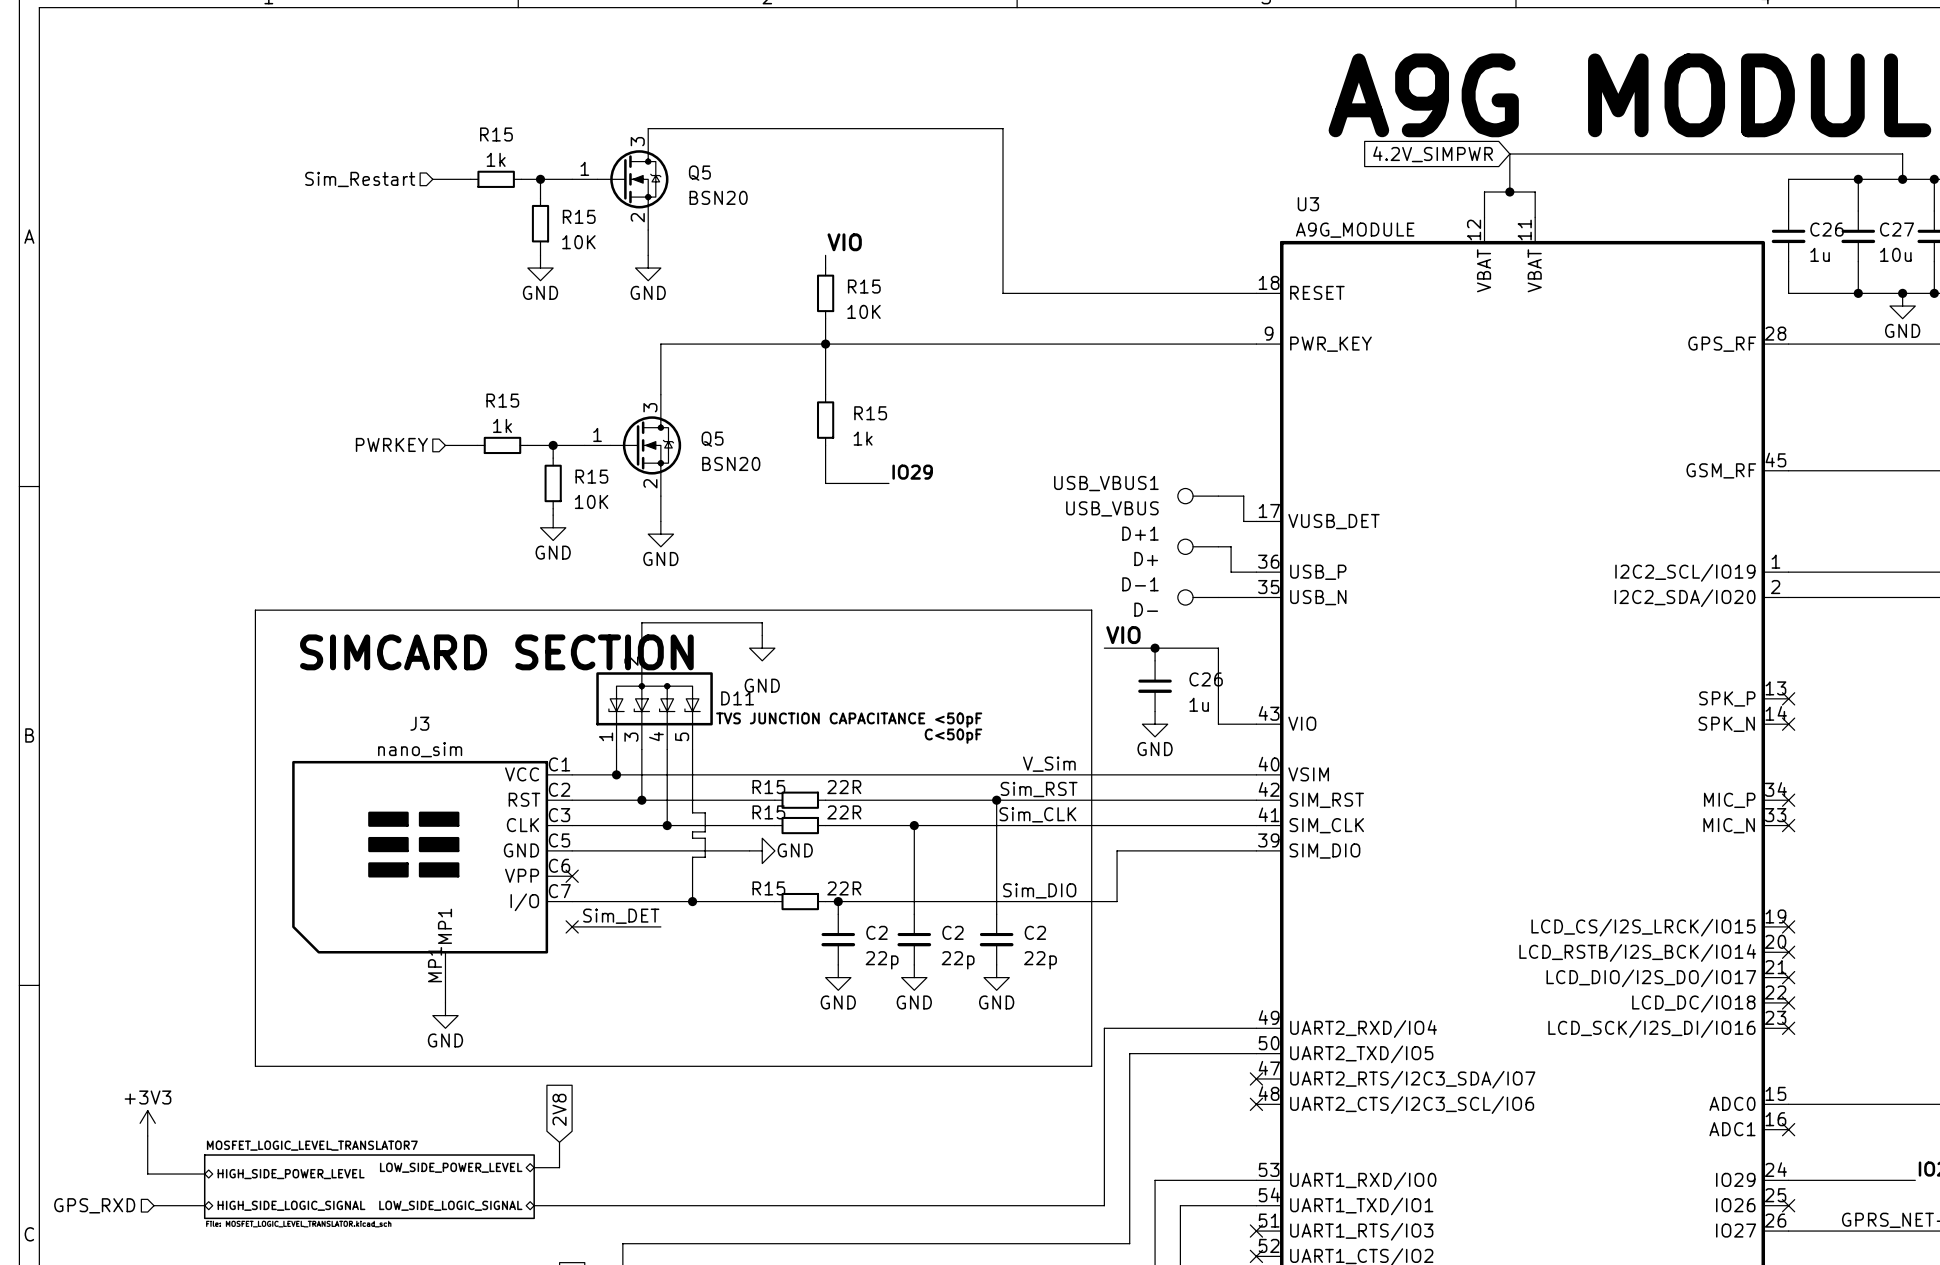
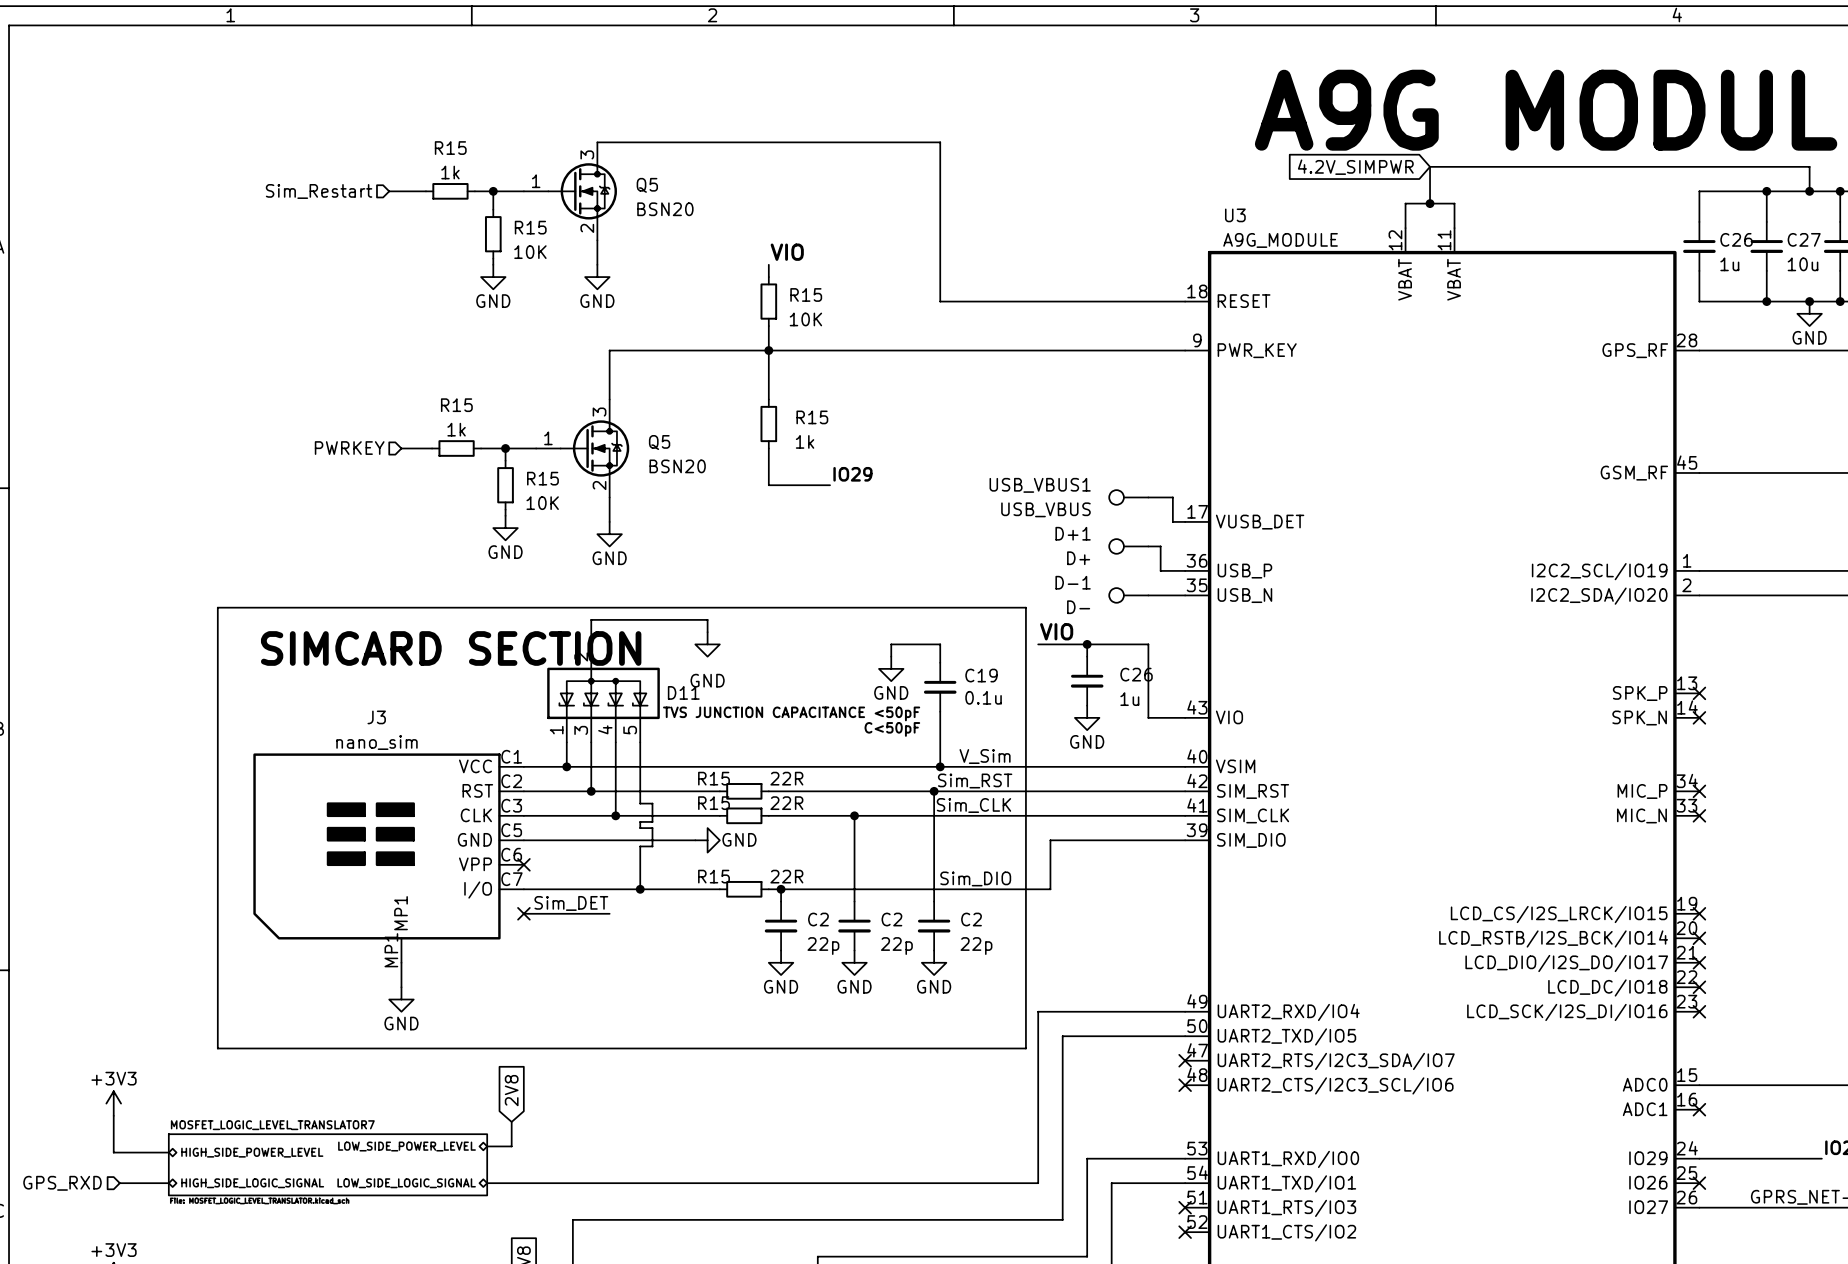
wire: none -> (891, 656) (891, 644) (940, 644) (940, 662)
power symbol: none -> GND (891, 668)
C19: none -> 0.1u (940, 687)
wire: none -> (940, 711) (940, 766)
junction: none -> (940, 766)

